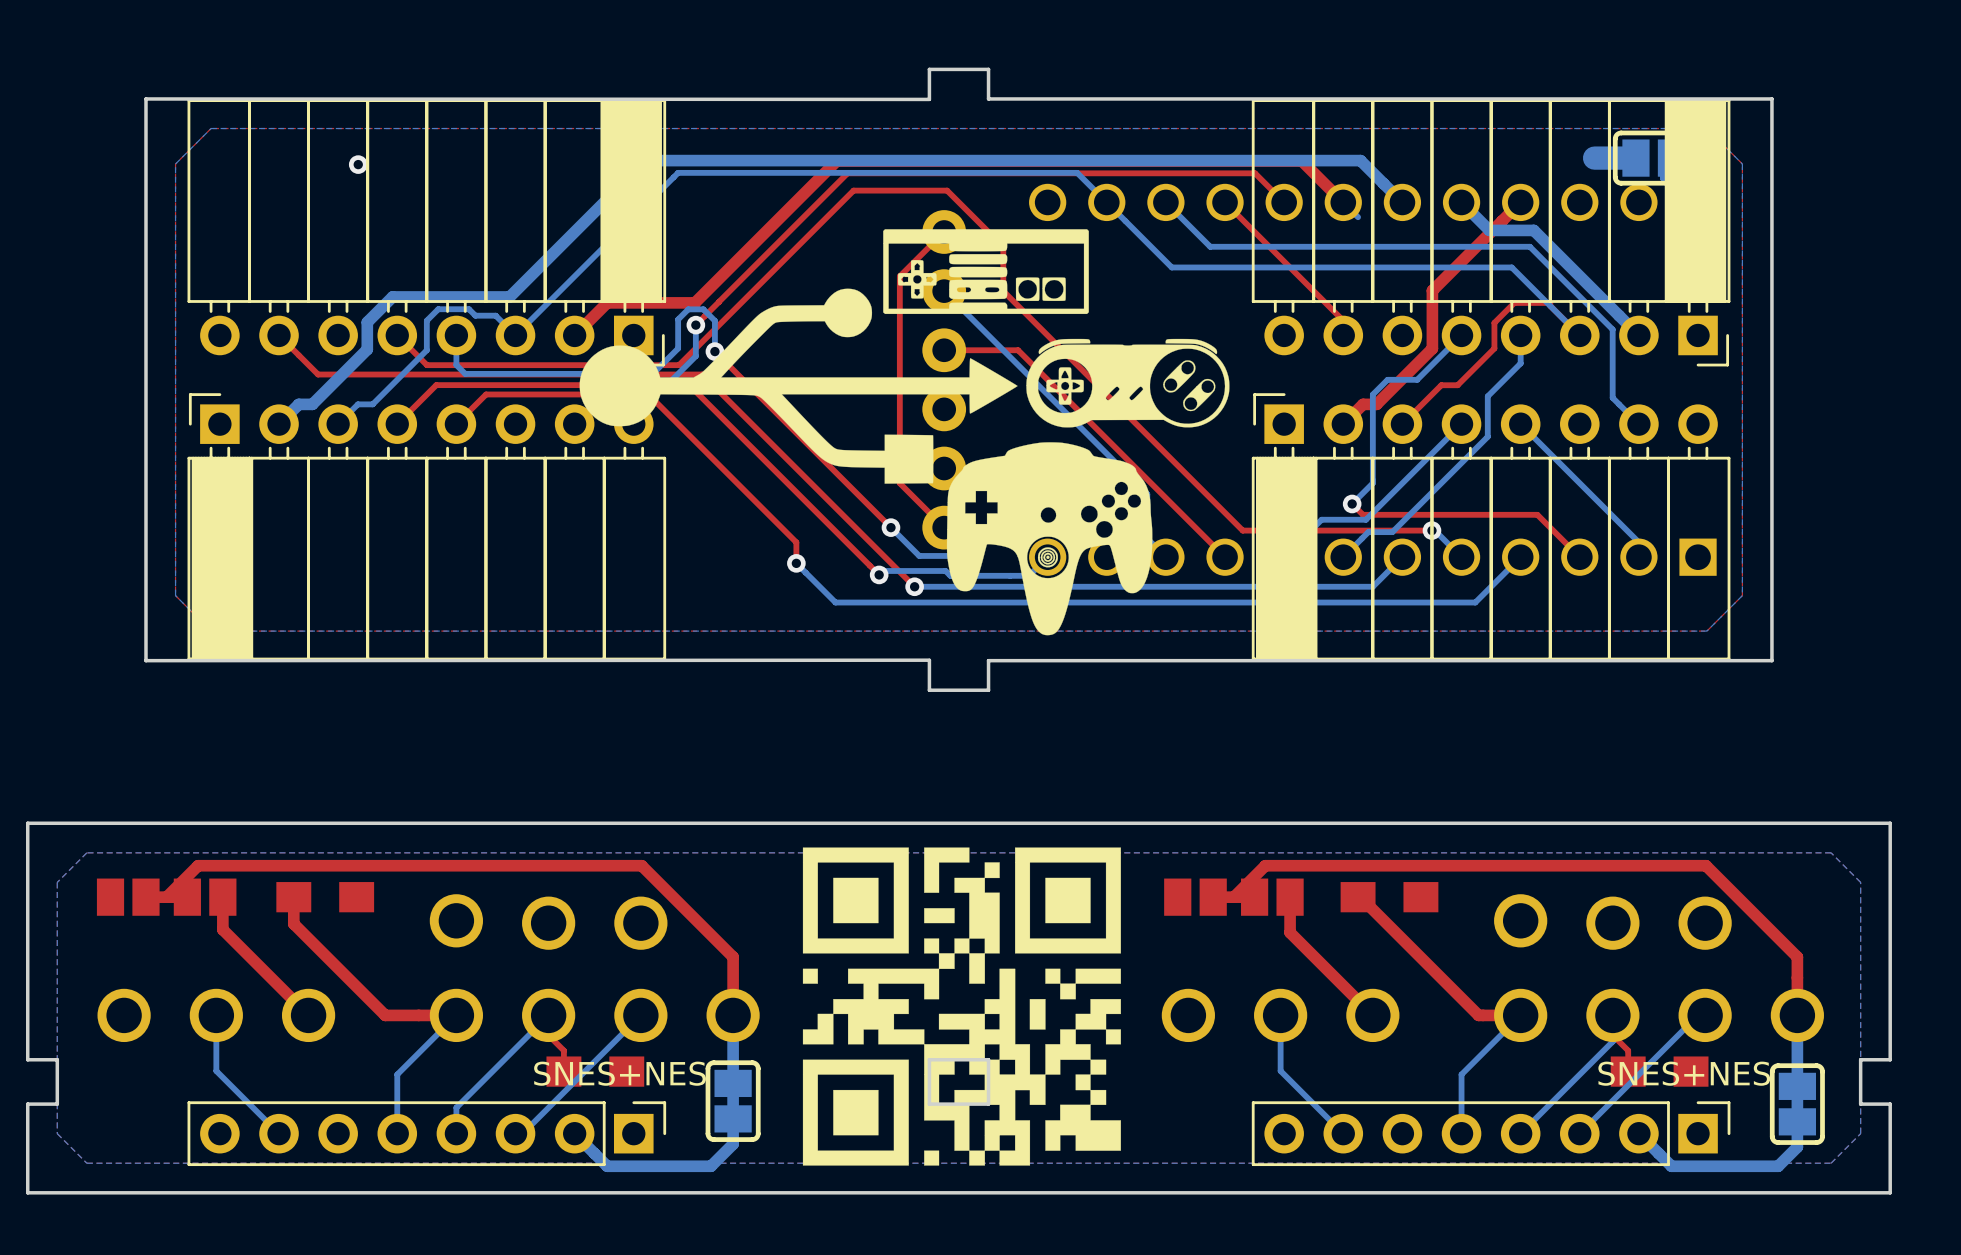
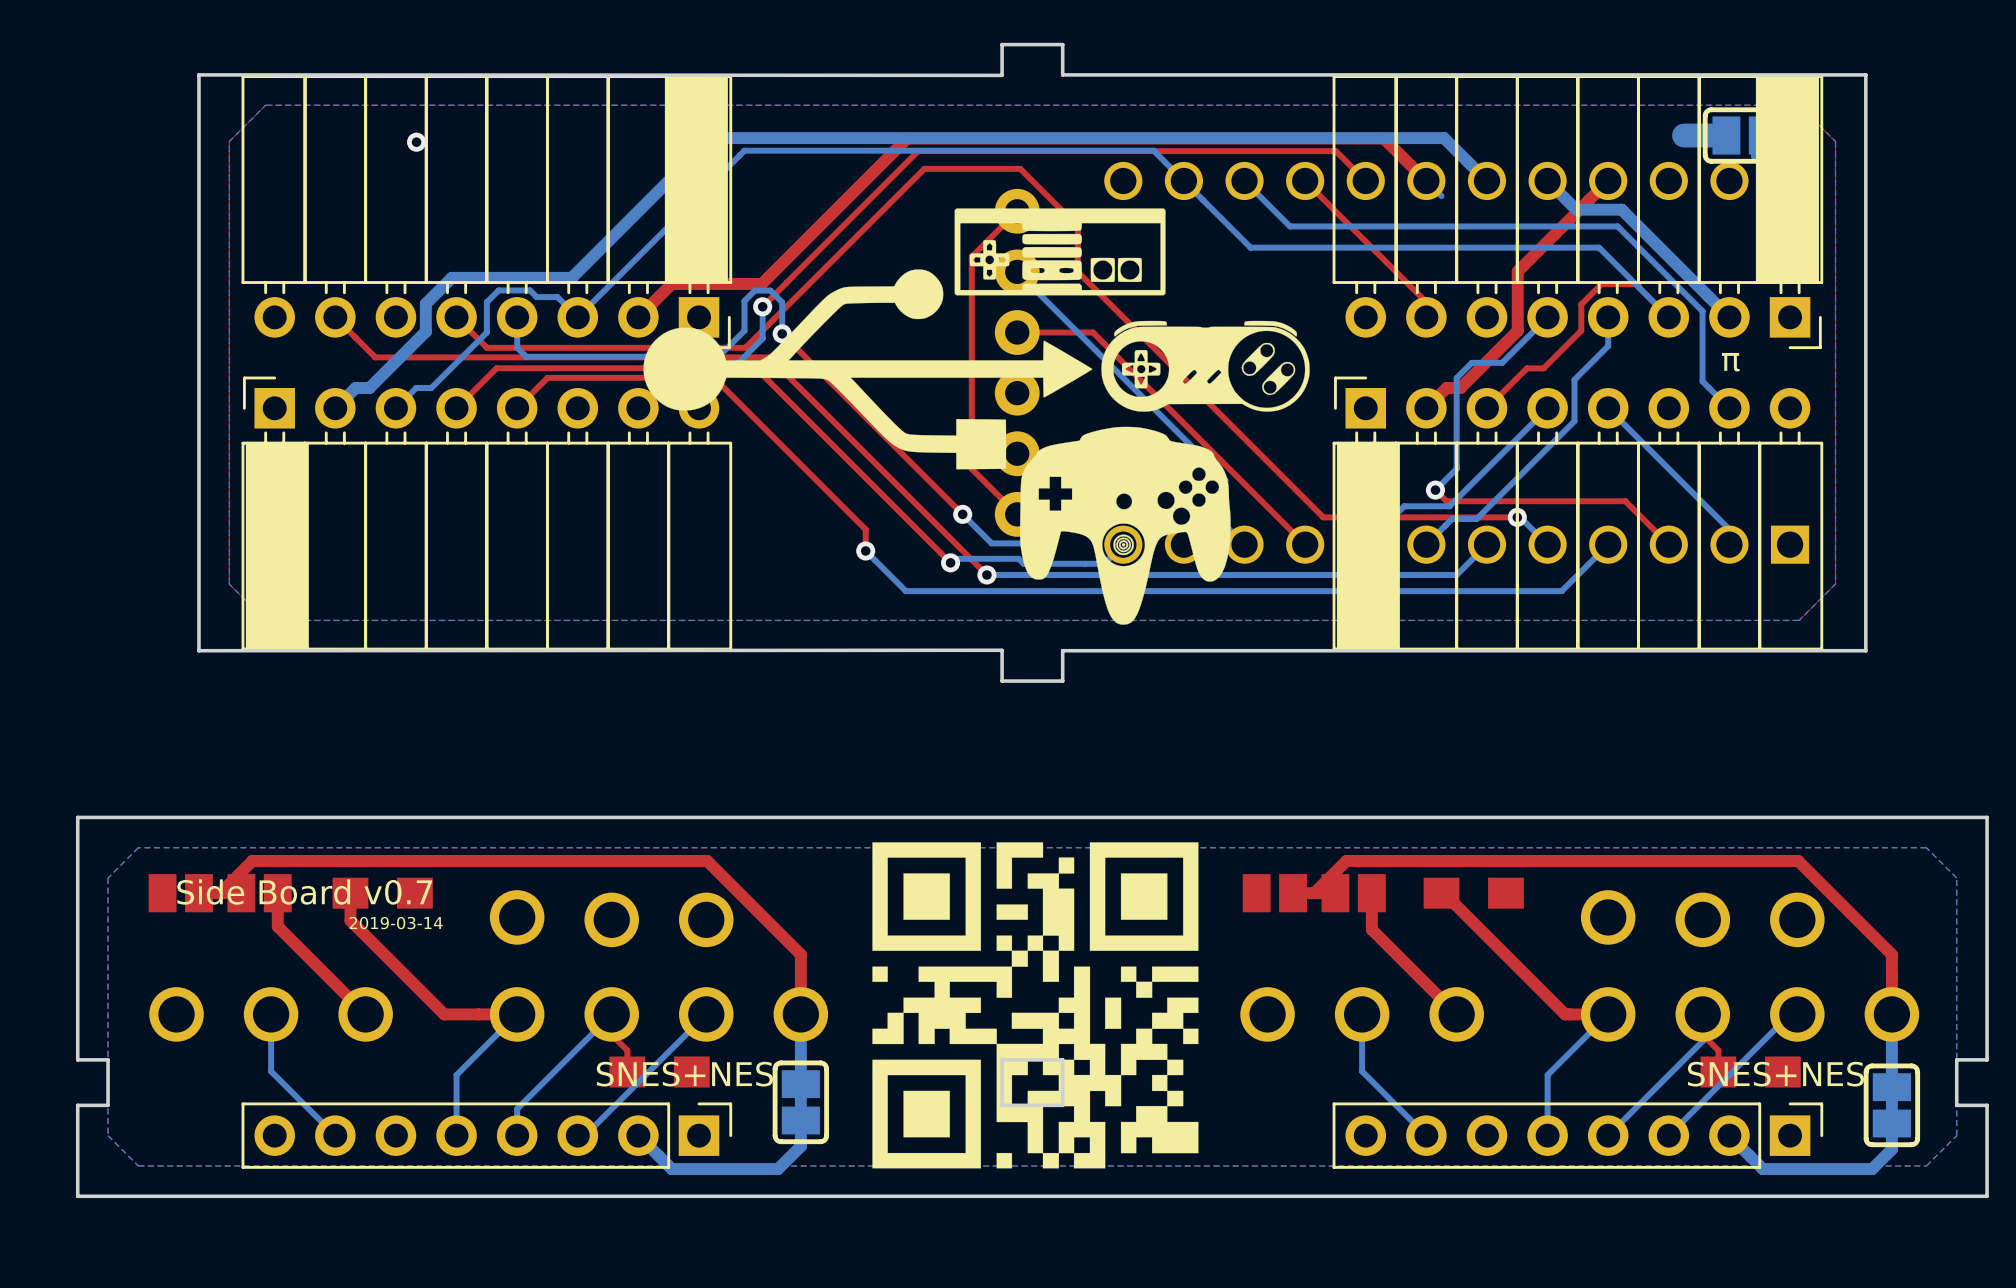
text: none -> π (1730, 362)
text: none -> Side Board v0.7 (304, 892)
text: none -> 2019-03-14 (396, 923)

